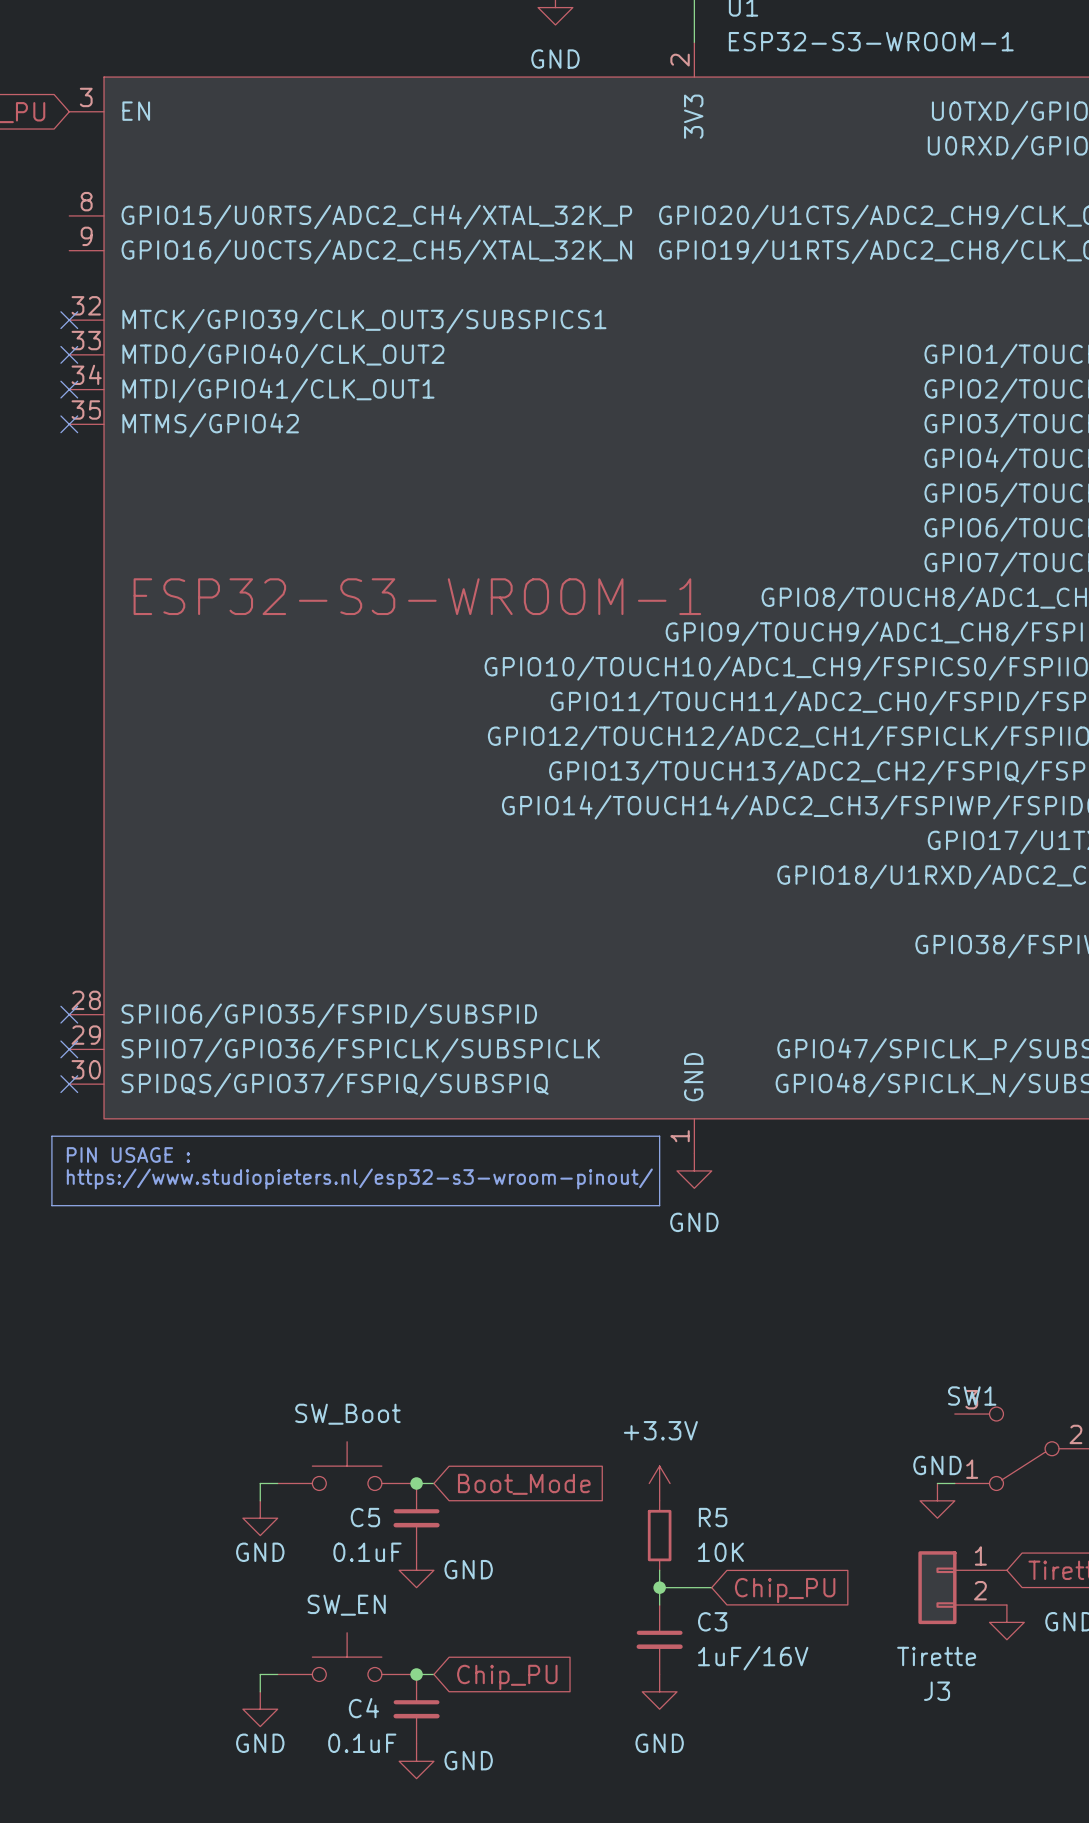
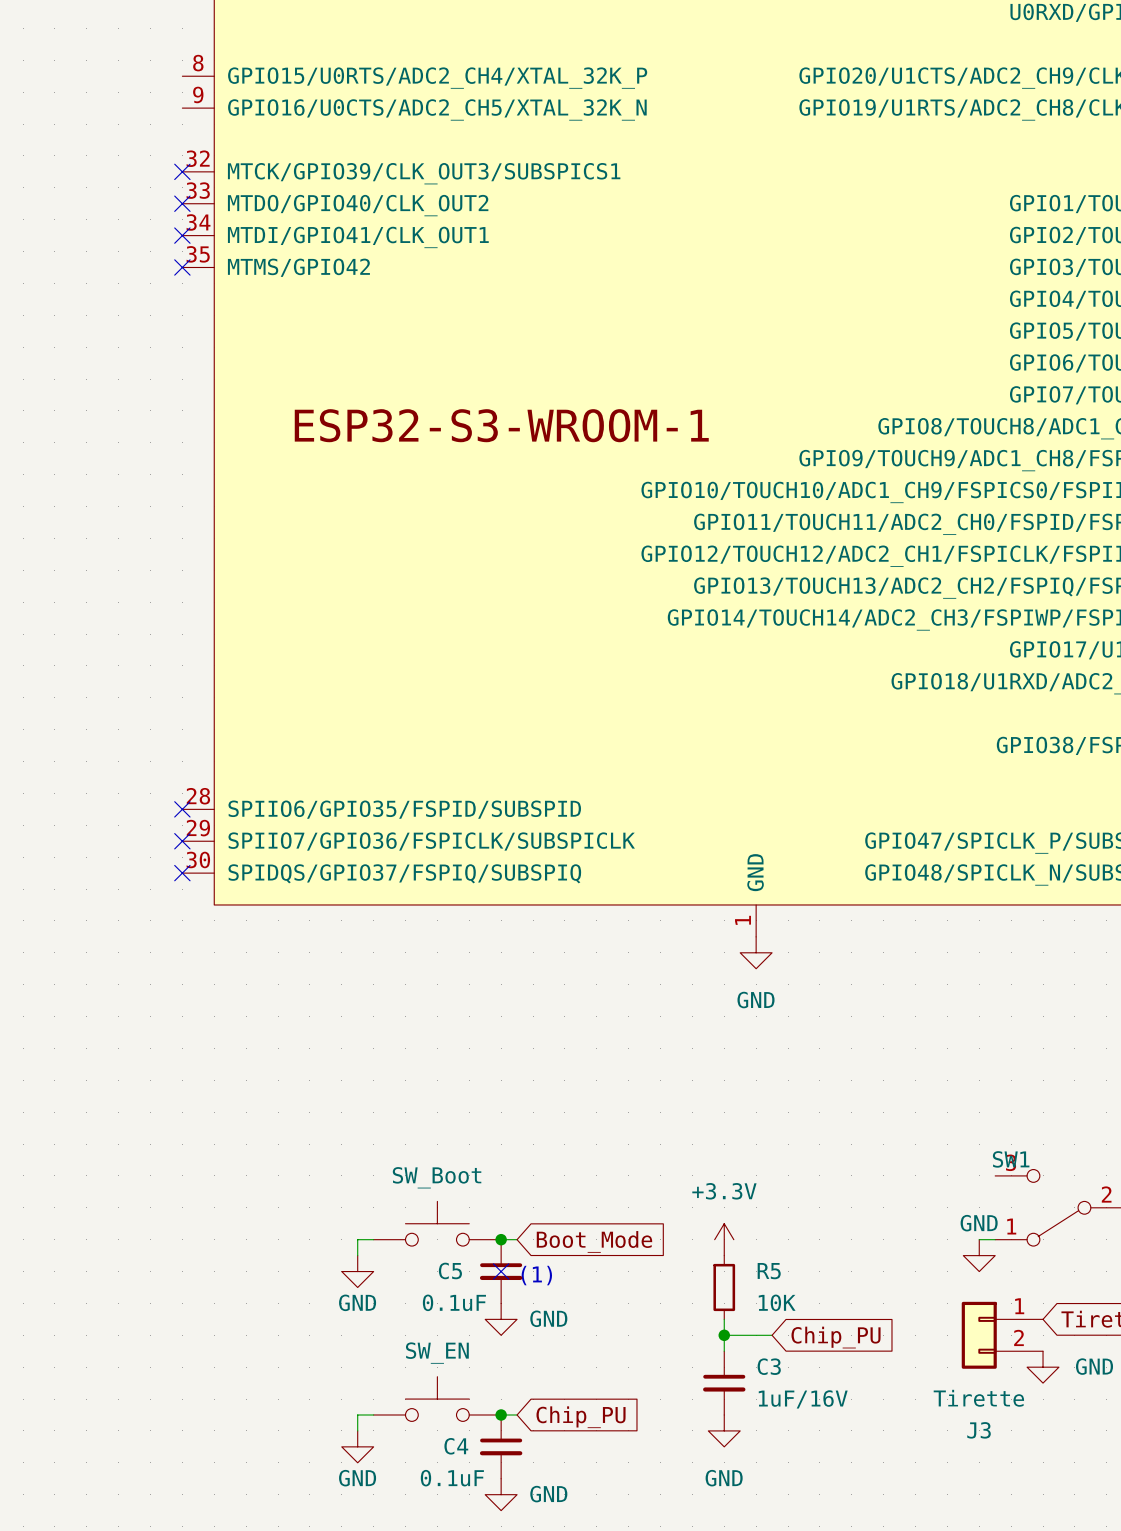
line: (51, 1136) (659, 1136) (659, 1205) (51, 1205) (51, 1136) -> none
text: PIN USAGE : (128, 1155) -> none
text: https://www.studiopieters.nl/esp32-s3-wroom-pinout/ (359, 1178) -> none
no-connect mark: none -> (501, 1271)
text: none -> (1) (536, 1275)

